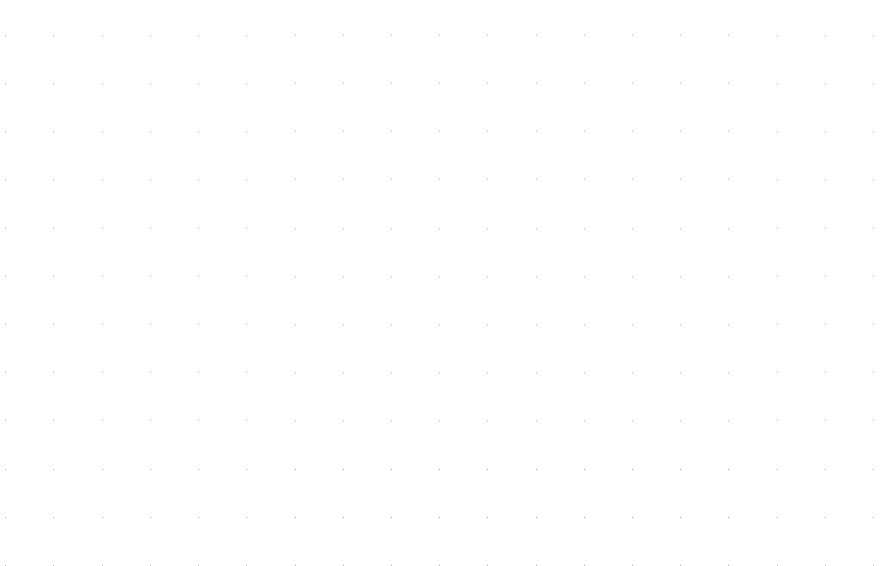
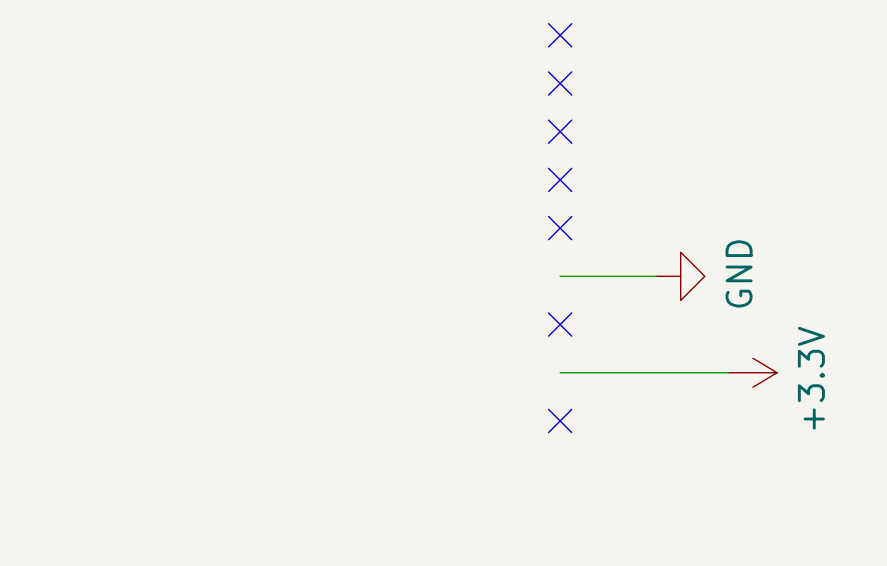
no-connect mark: none -> (560, 35)
no-connect mark: none -> (560, 83)
no-connect mark: none -> (560, 131)
no-connect mark: none -> (560, 179)
no-connect mark: none -> (560, 228)
wire: none -> (560, 276) (656, 276)
power symbol: none -> GND (680, 276)
no-connect mark: none -> (560, 324)
wire: none -> (560, 372) (728, 372)
power symbol: none -> +3.3V (752, 372)
no-connect mark: none -> (560, 420)

